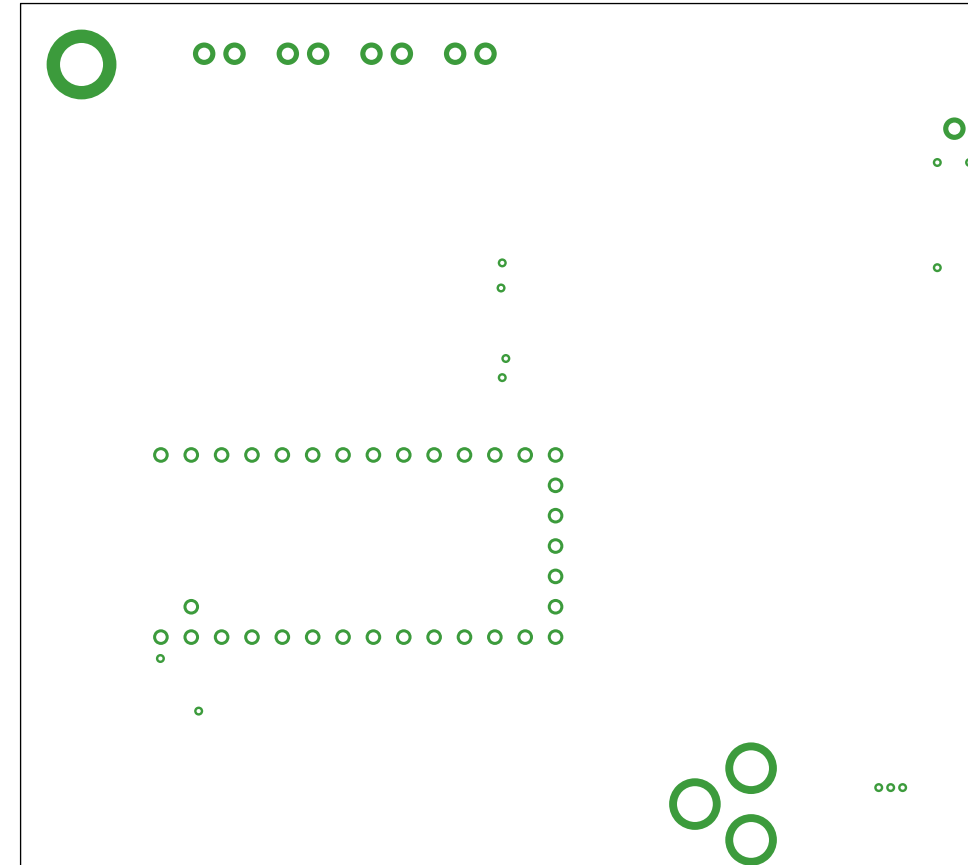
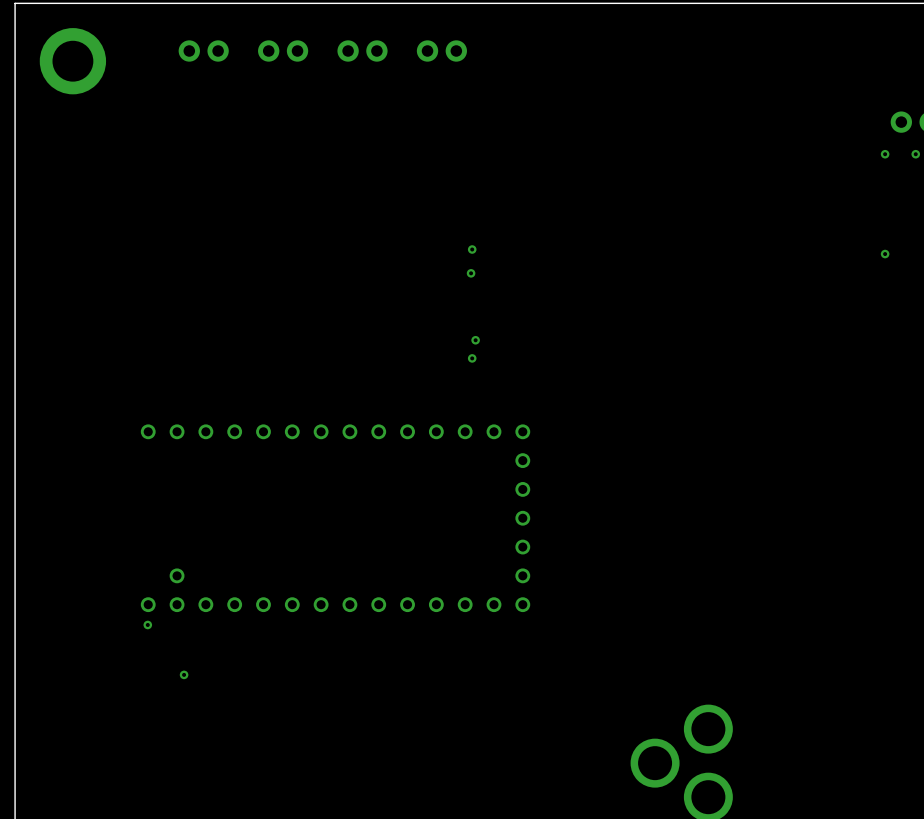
via: (878, 787) -> none
via: (890, 787) -> none
via: (902, 787) -> none

